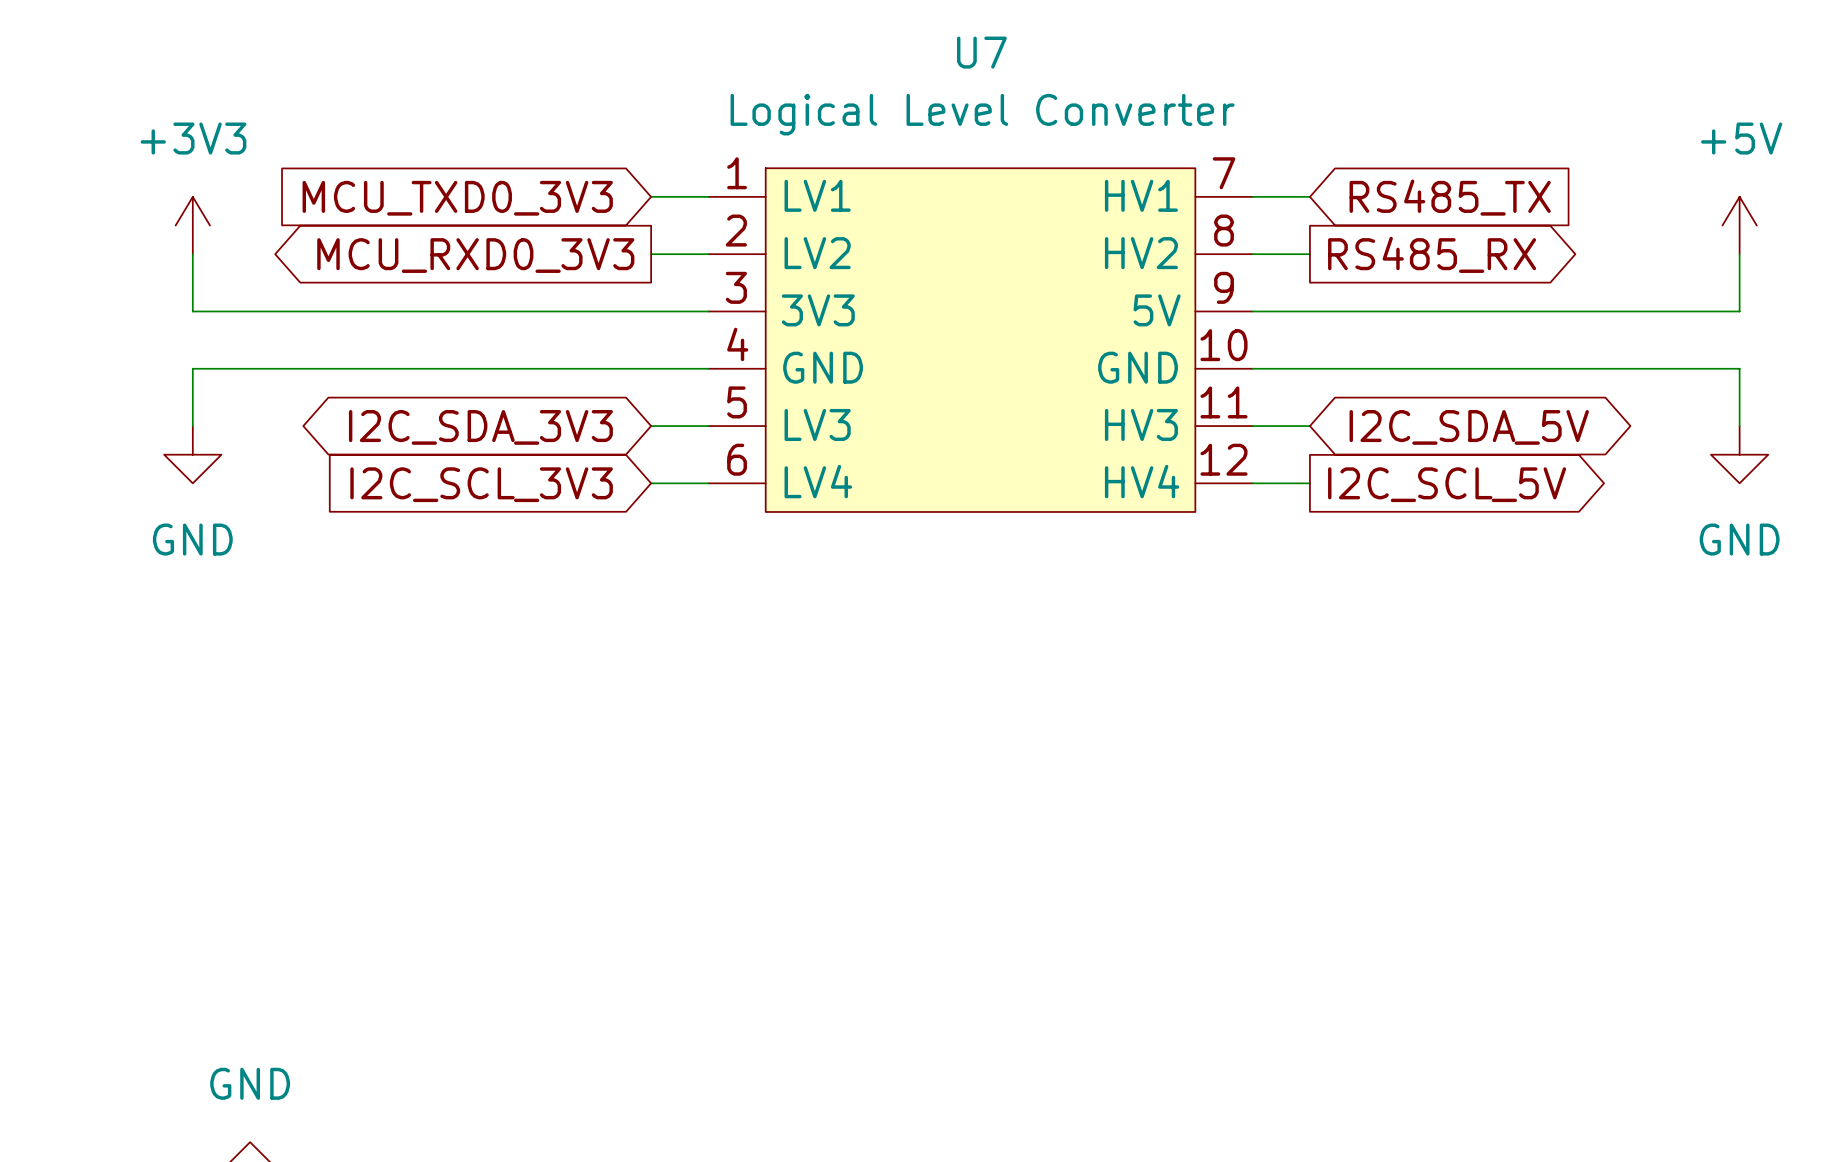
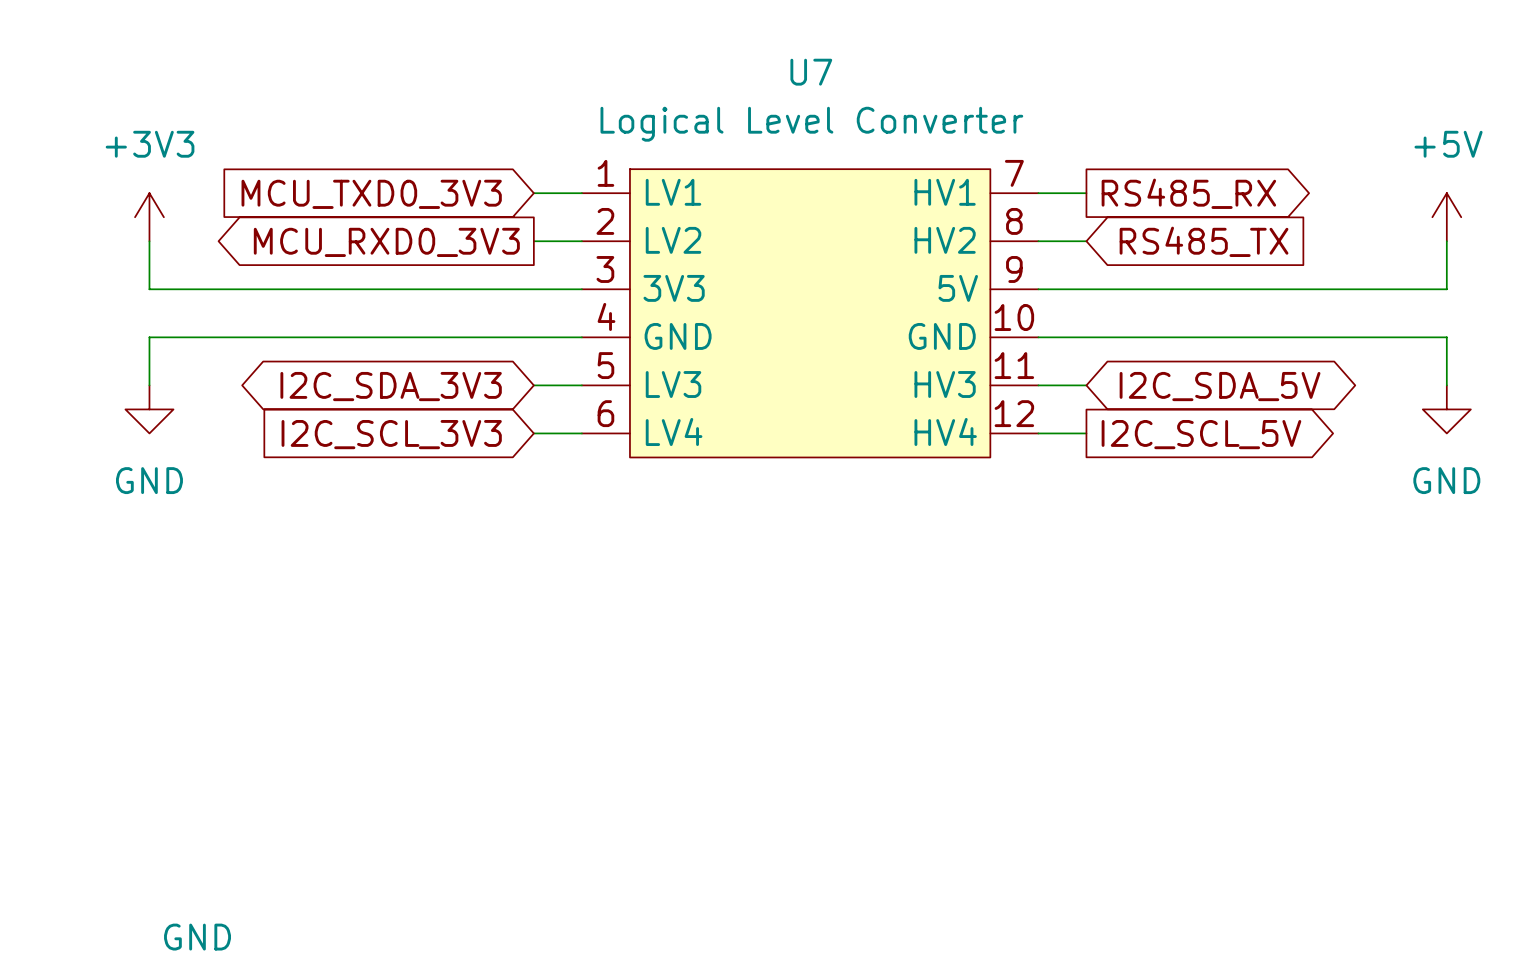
global label shape: input (1450, 197) -> output (1188, 193)
global label: RS485_TX (1450, 197) -> RS485_RX (1188, 193)
global label shape: output (1432, 254) -> input (1204, 241)
global label: RS485_RX (1432, 254) -> RS485_TX (1204, 241)

